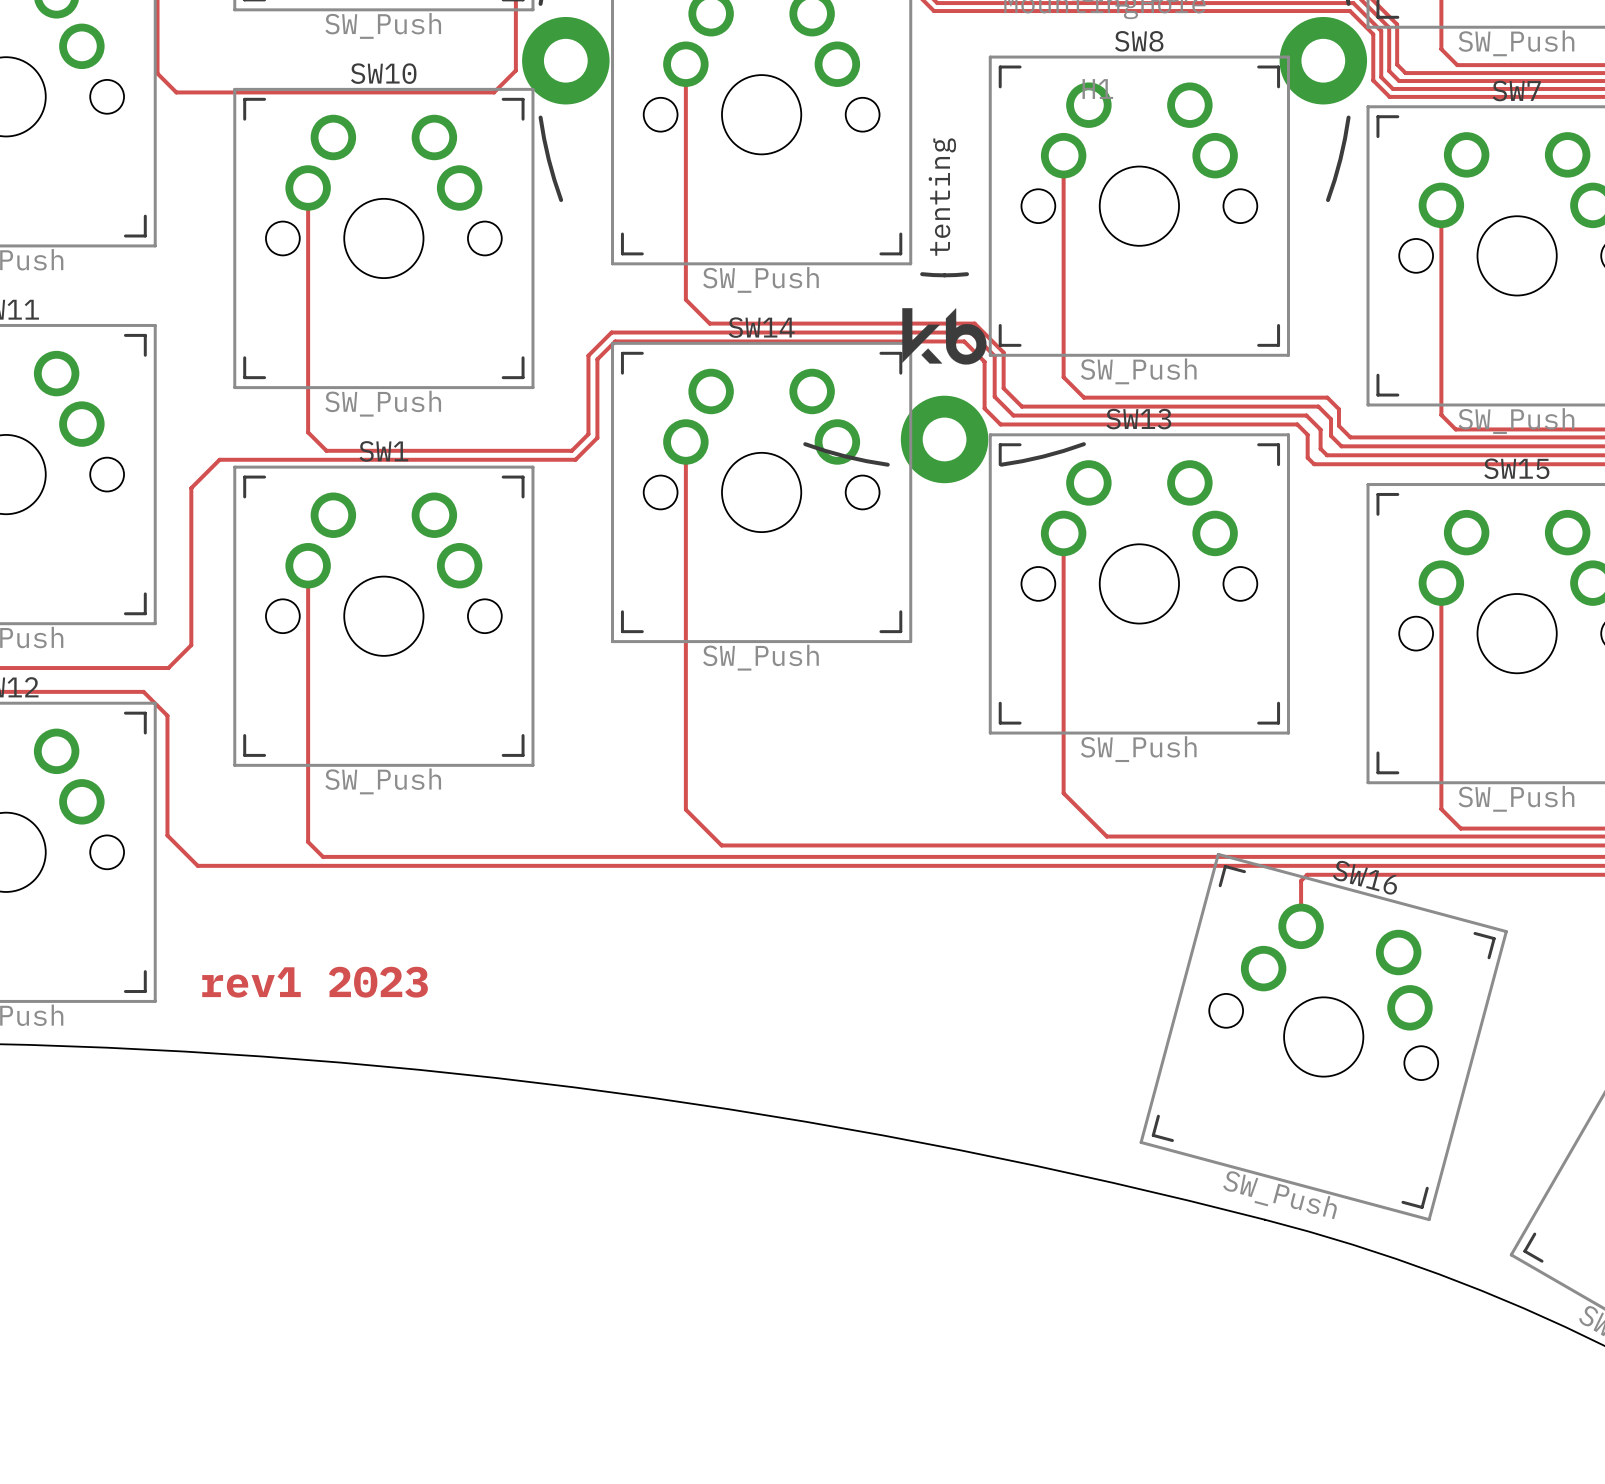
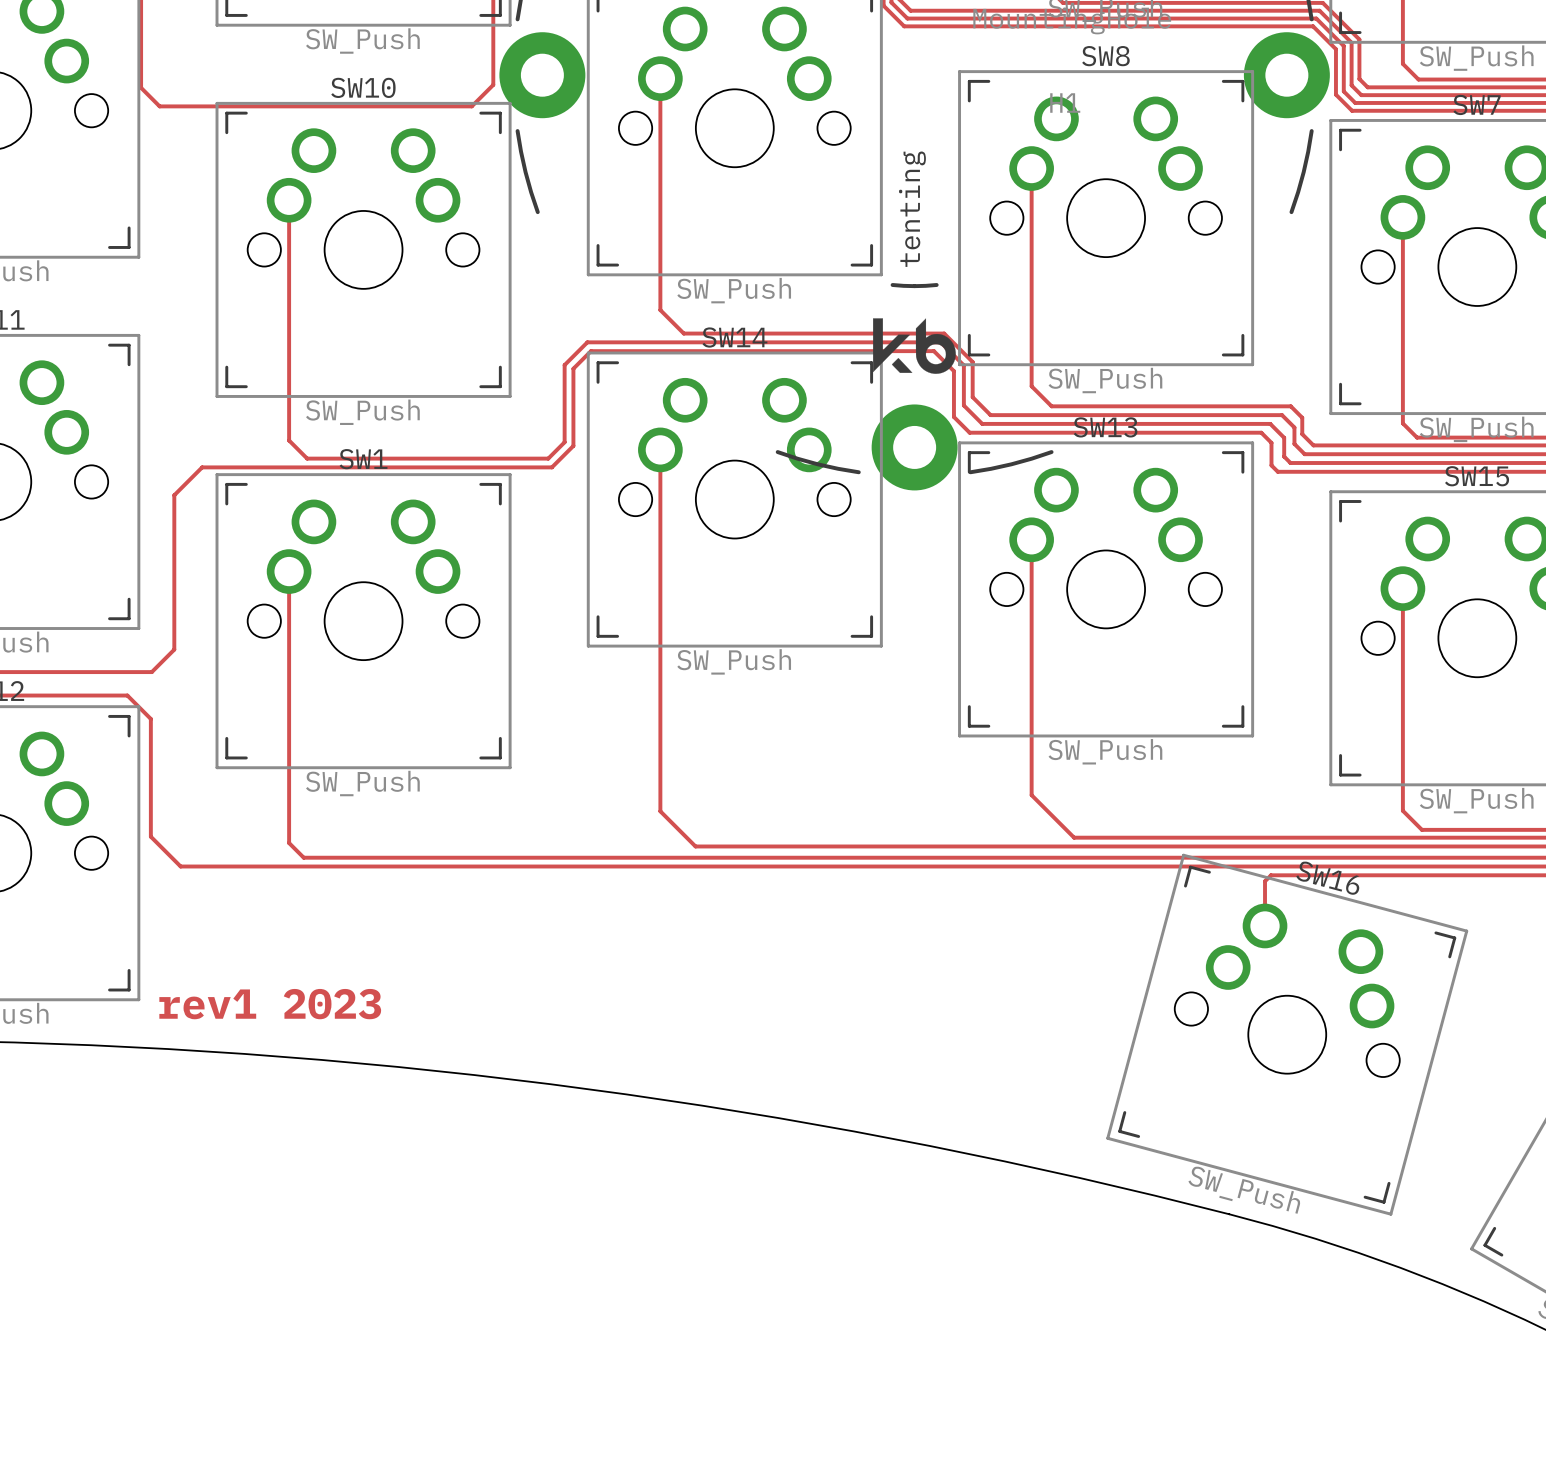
text position: rev1 2023 (315, 982) -> rev1 2023 (270, 1004)

